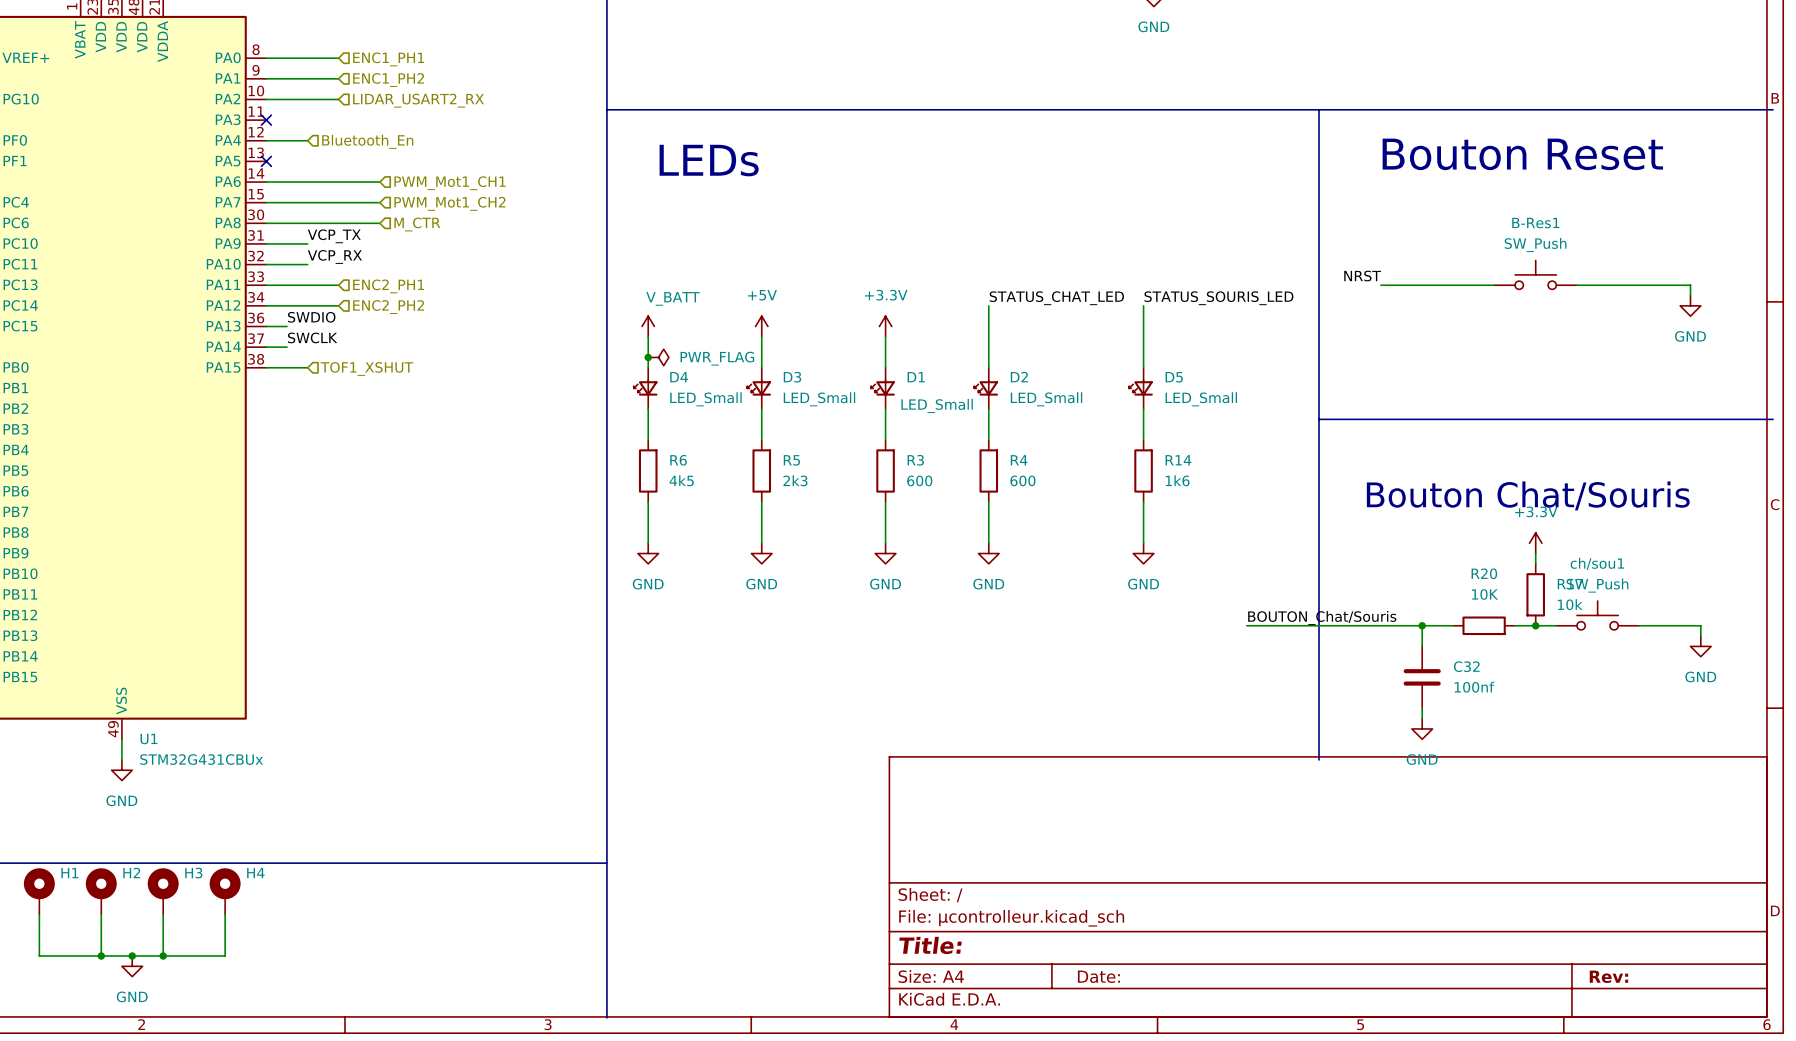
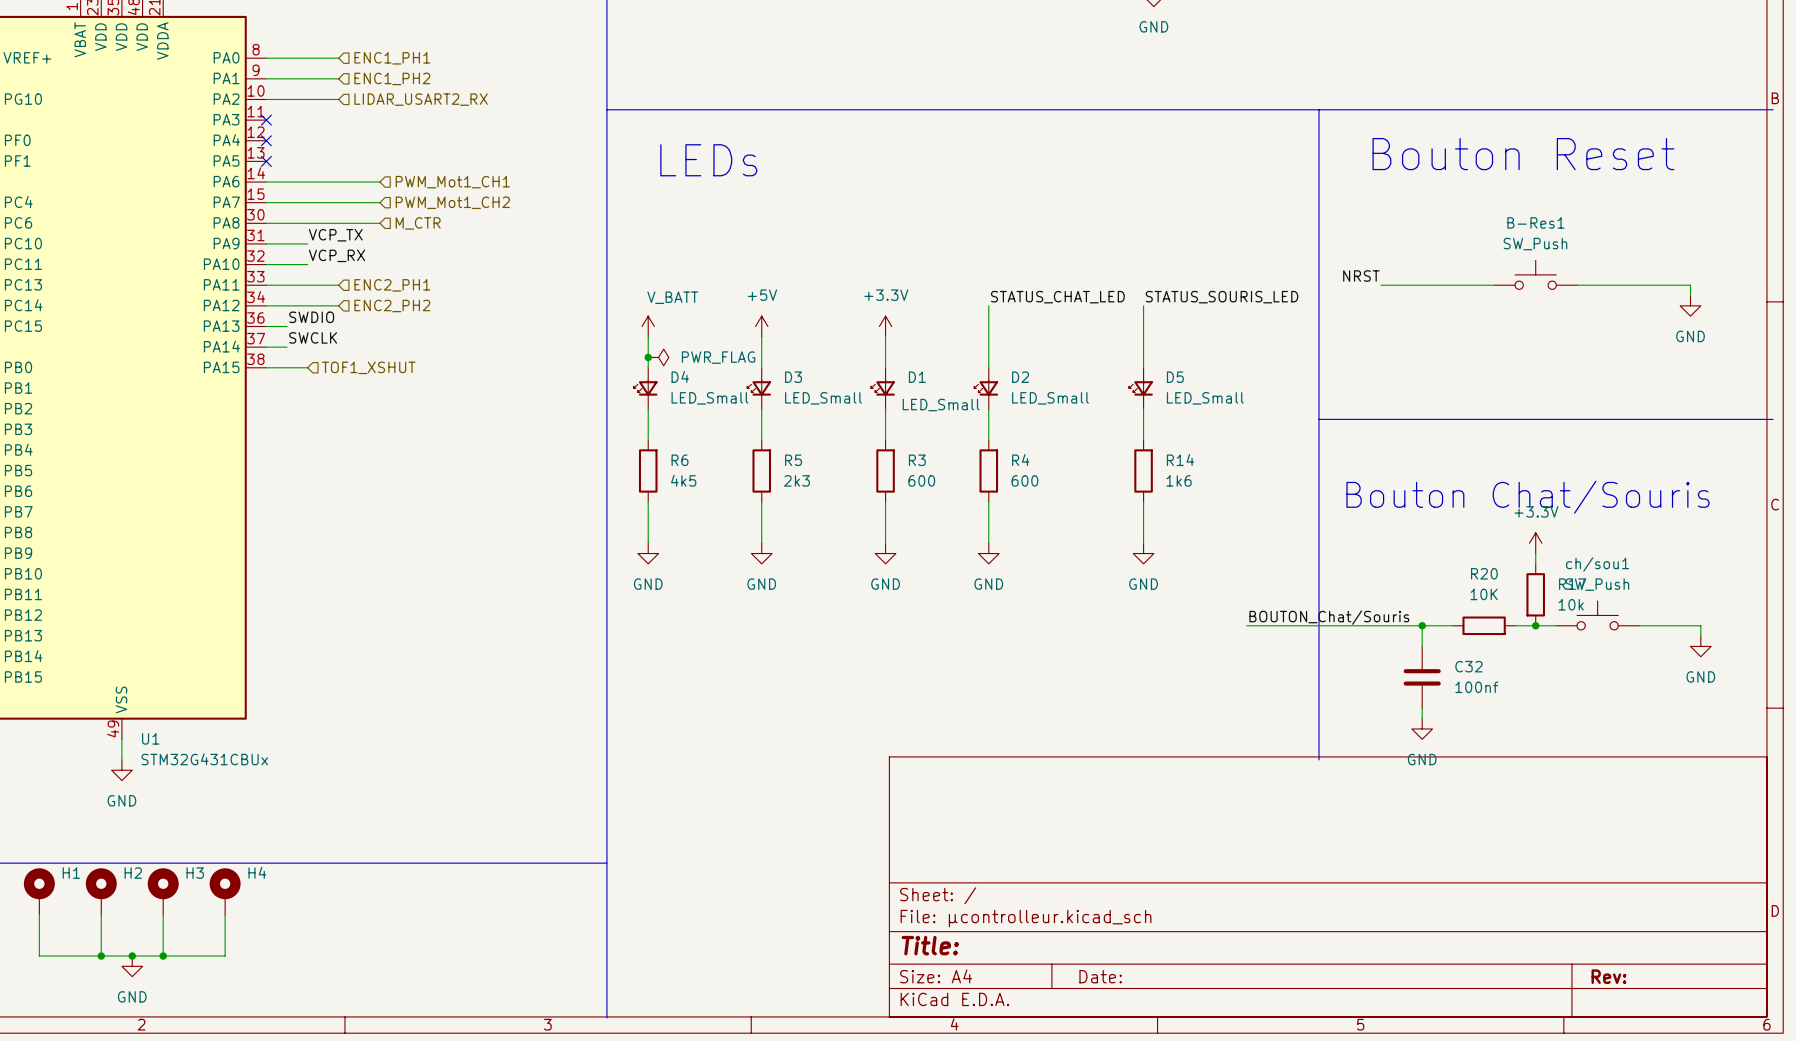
wire: (266, 140) (307, 140) -> none
no-connect mark: none -> (266, 140)
hierarchical label: Bluetooth_En (367, 141) -> none

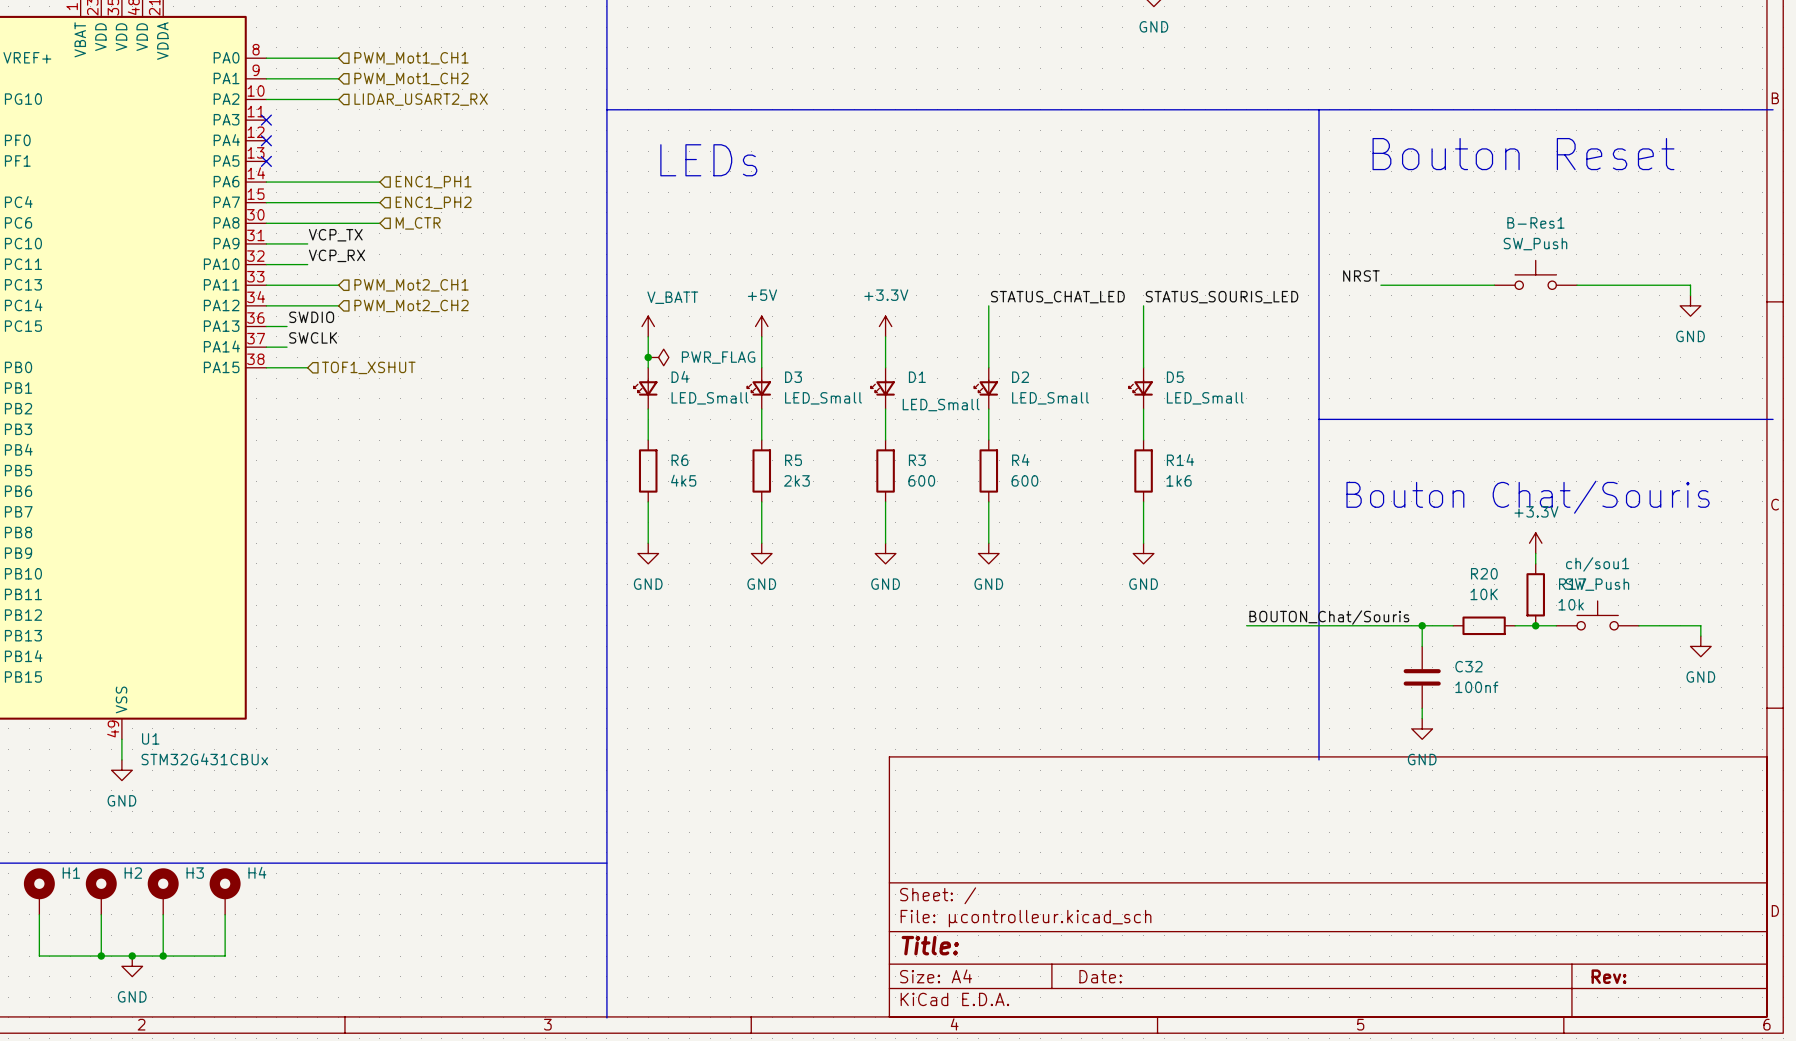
hierarchical label: ENC1_PH1 (392, 58) -> PWM_Mot1_CH1 (411, 58)
hierarchical label: ENC1_PH2 (392, 78) -> PWM_Mot1_CH2 (411, 78)
hierarchical label: PWM_Mot1_CH1 (452, 182) -> ENC1_PH1 (433, 182)
hierarchical label: PWM_Mot1_CH2 (452, 202) -> ENC1_PH2 (433, 202)
hierarchical label: ENC2_PH1 (392, 285) -> PWM_Mot2_CH1 (411, 285)
hierarchical label: ENC2_PH2 (392, 305) -> PWM_Mot2_CH2 (411, 305)

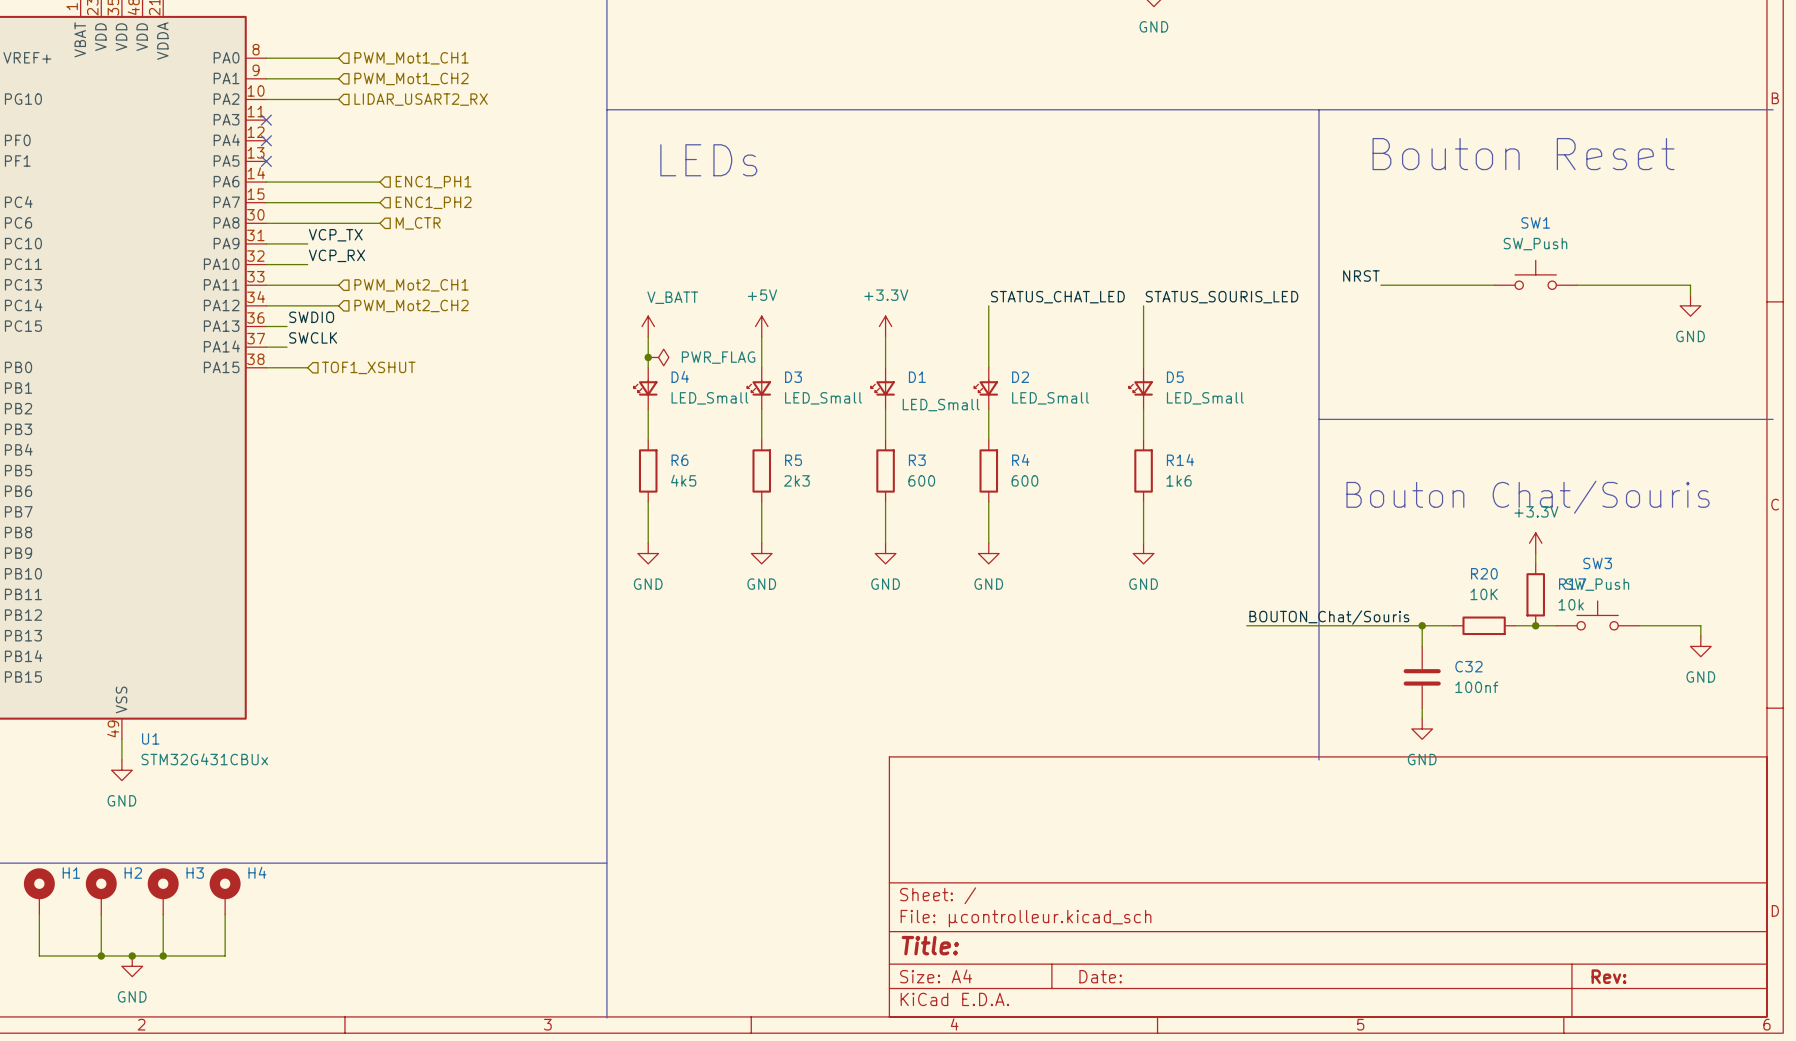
B-Res1 name: B-Res1 (1535, 222) -> SW1 (1535, 222)
ch/sou1 name: ch/sou1 (1597, 564) -> SW3 (1597, 563)

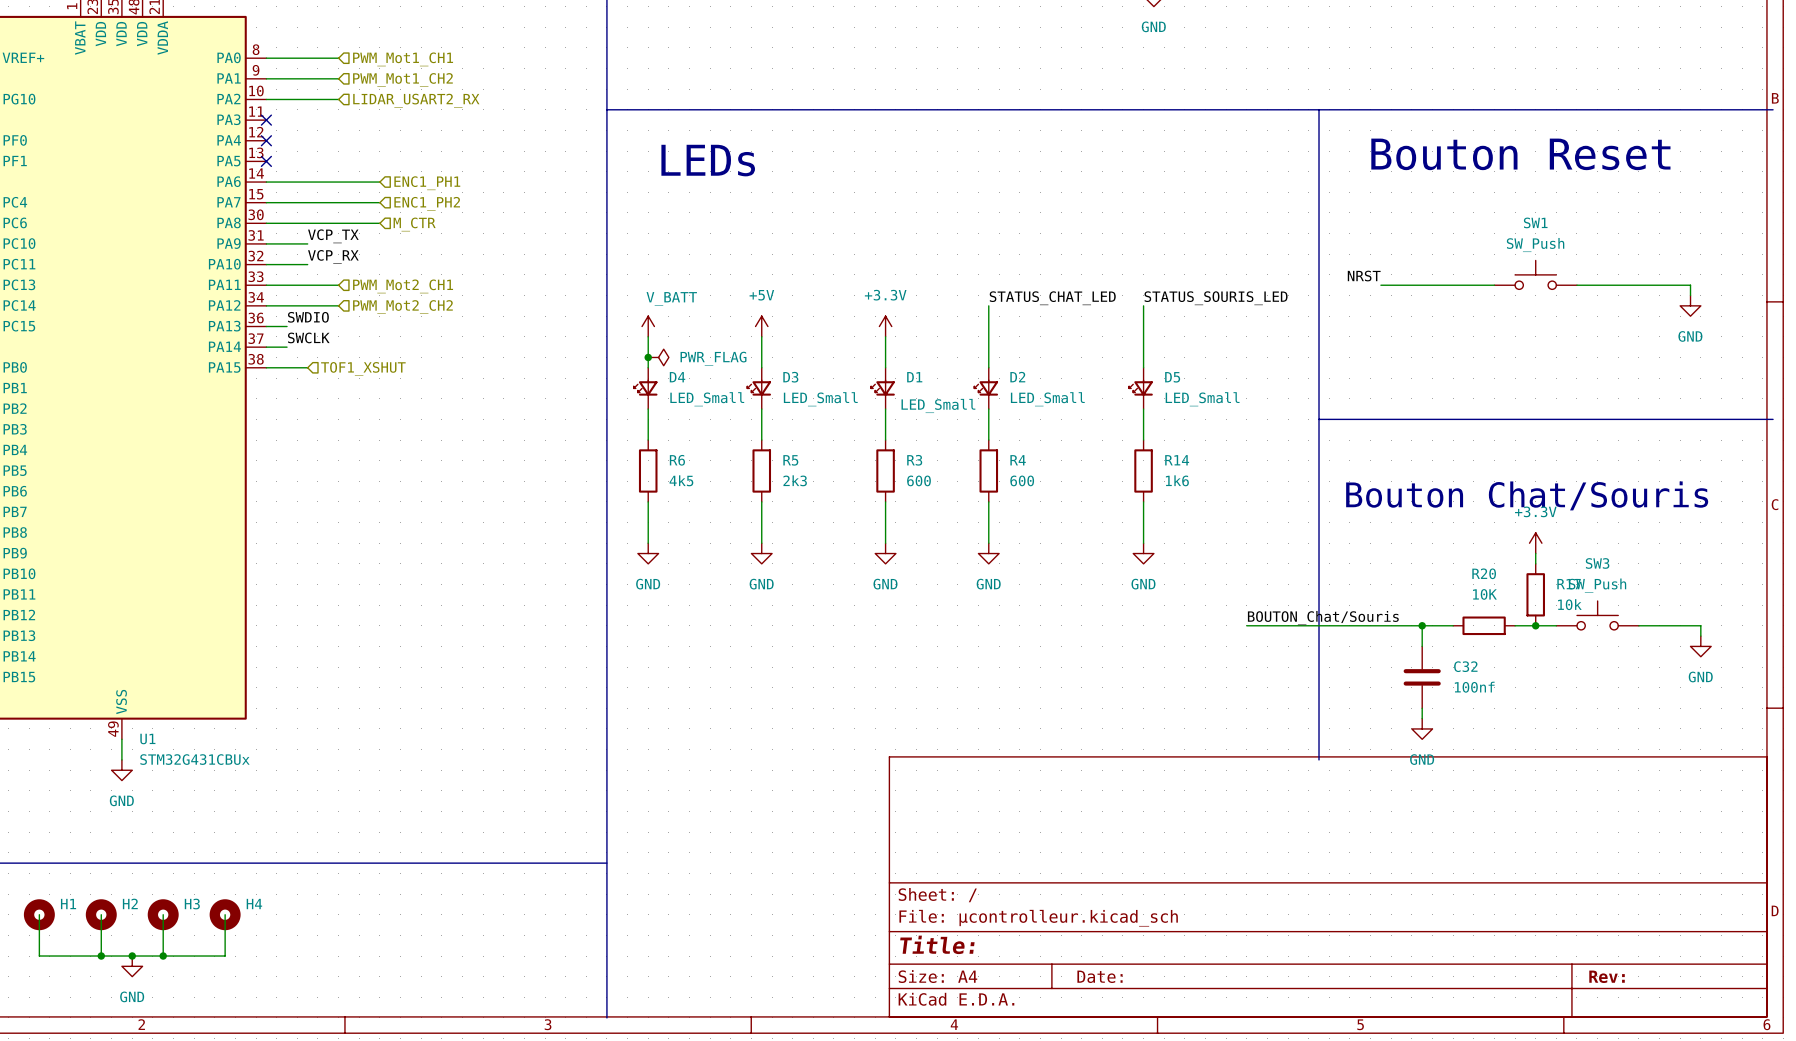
H1 symbol: [23, 868, 55, 915] -> [23, 899, 55, 931]
H2 symbol: [85, 868, 117, 915] -> [85, 899, 117, 931]
H3 symbol: [147, 868, 179, 915] -> [147, 899, 179, 931]
H4 symbol: [209, 868, 241, 915] -> [209, 899, 241, 931]

